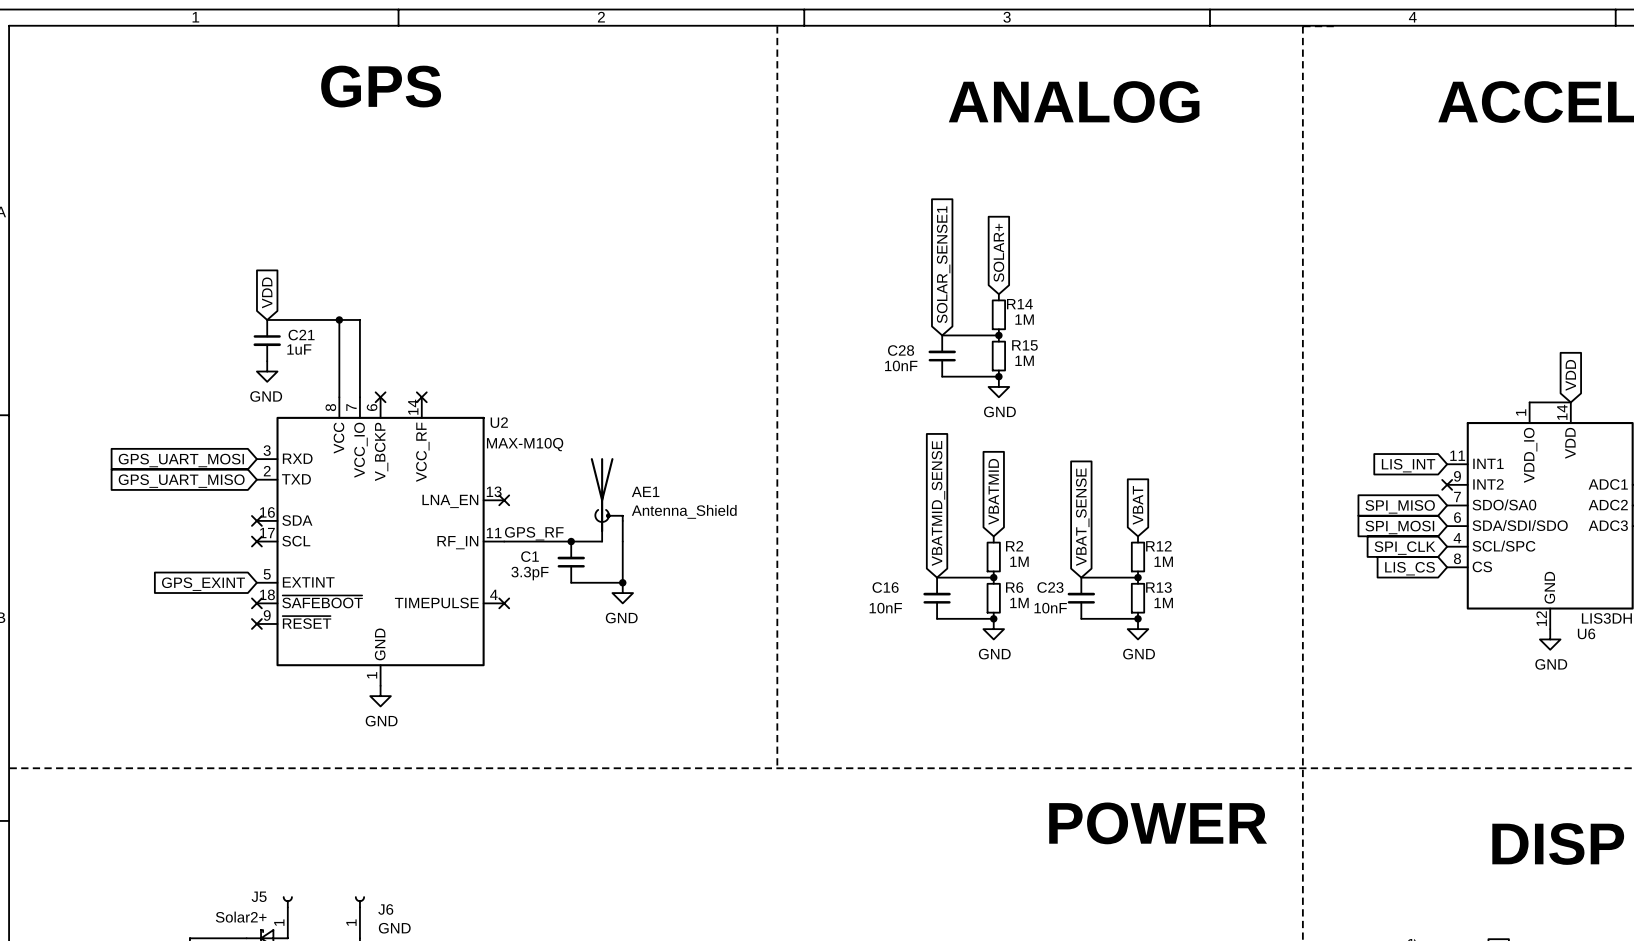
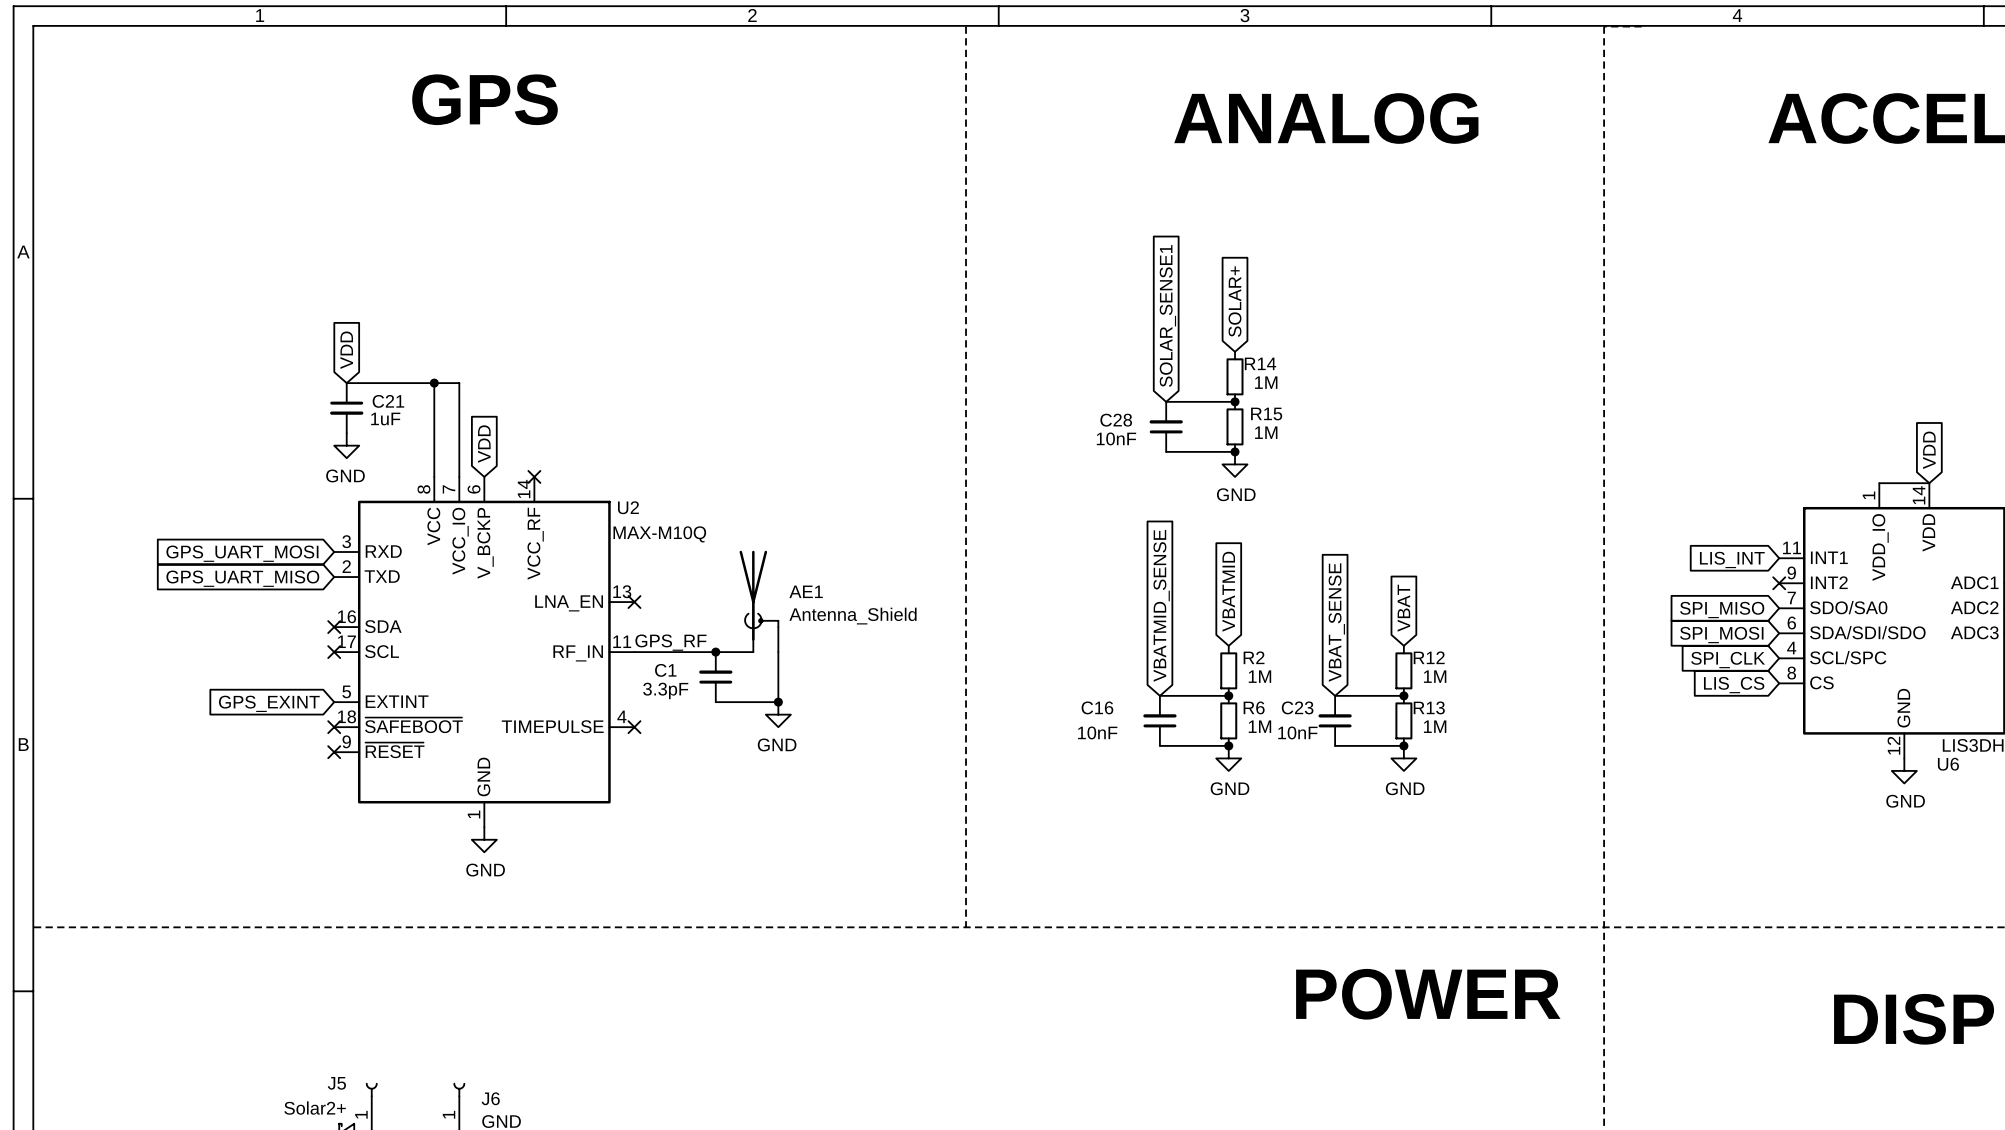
global label: none -> VDD (484, 444)
no-connect mark: (380, 397) -> none

